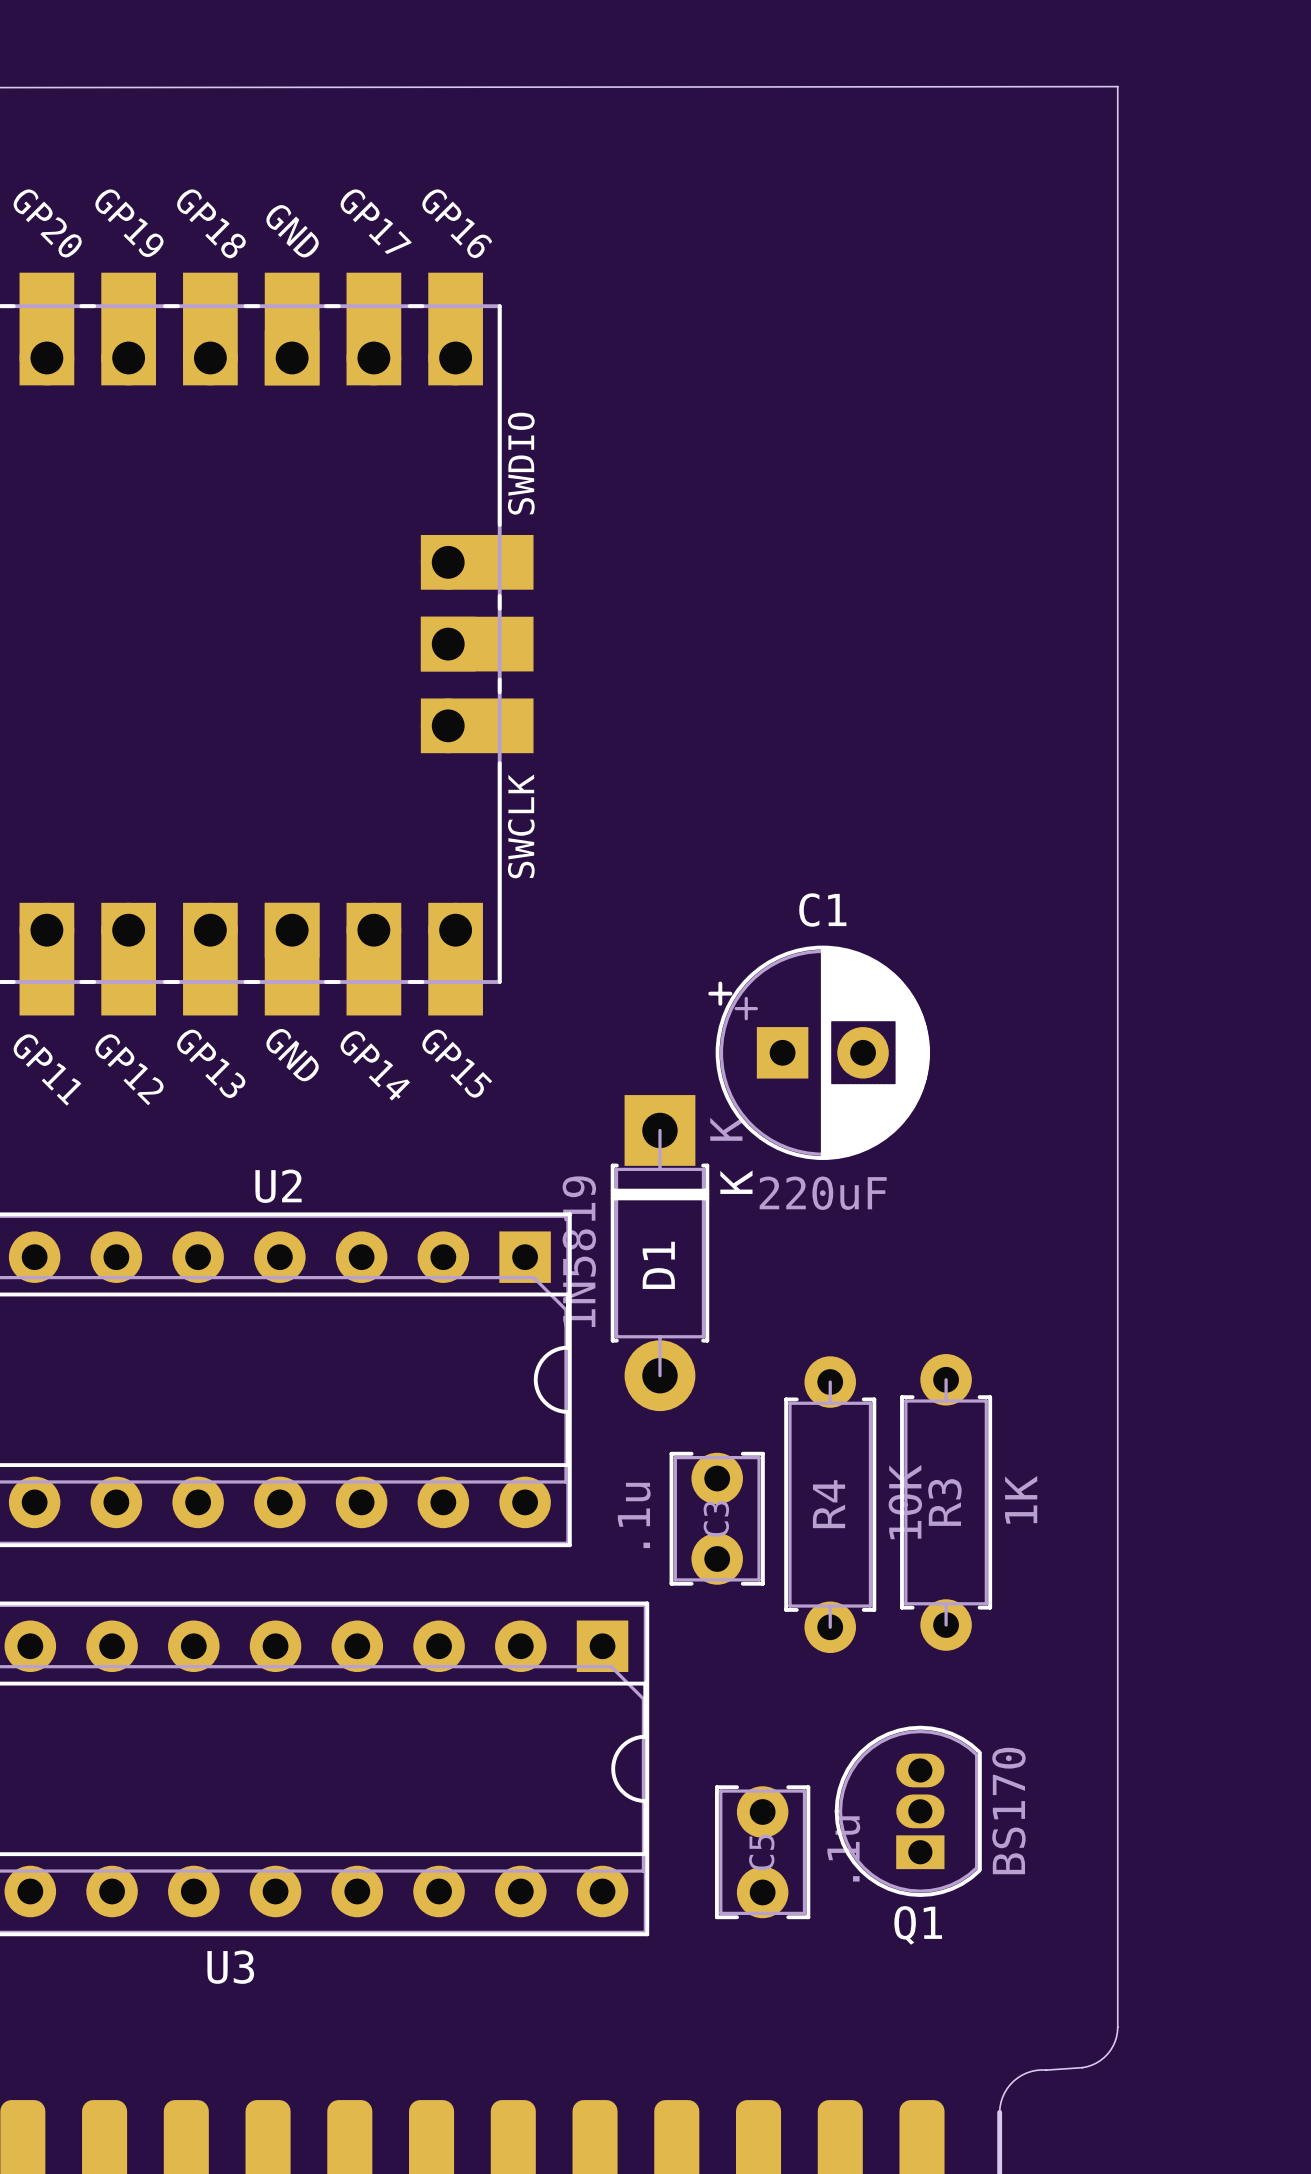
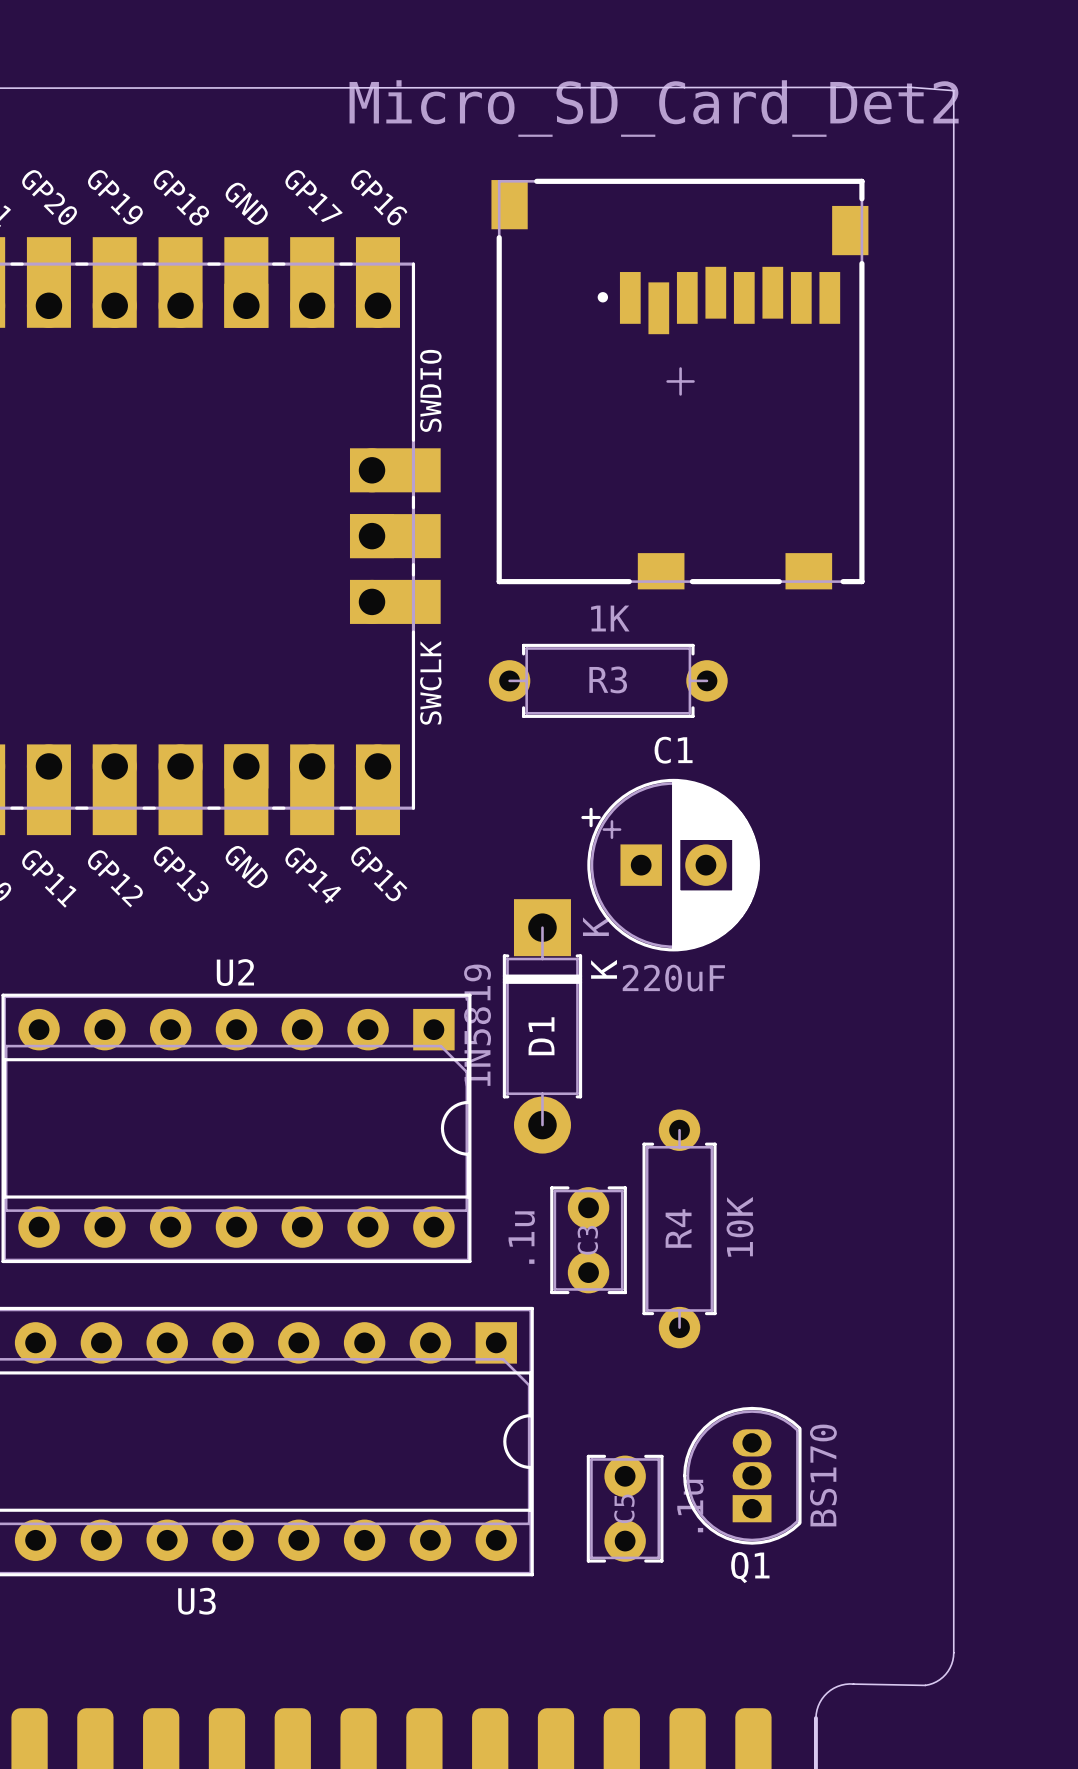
board edge: (1117, 86) (1117, 2027) (1115, 2041) (1110, 2050) (1096, 2063) (1082, 2067) (1046, 2070) -> (910, 87) (953, 90) (953, 1652) (948, 1671) (939, 1679) (929, 1684) (853, 1684)
part: none -> Micro_SD_Card_Det2 (679, 384)
R3 value position: 1K (1021, 1499) -> 1K (610, 618)
R3 rotation: 0° (946, 1502) -> 90° clockwise (608, 680)
R3 position: (946, 1502) -> (608, 680)

